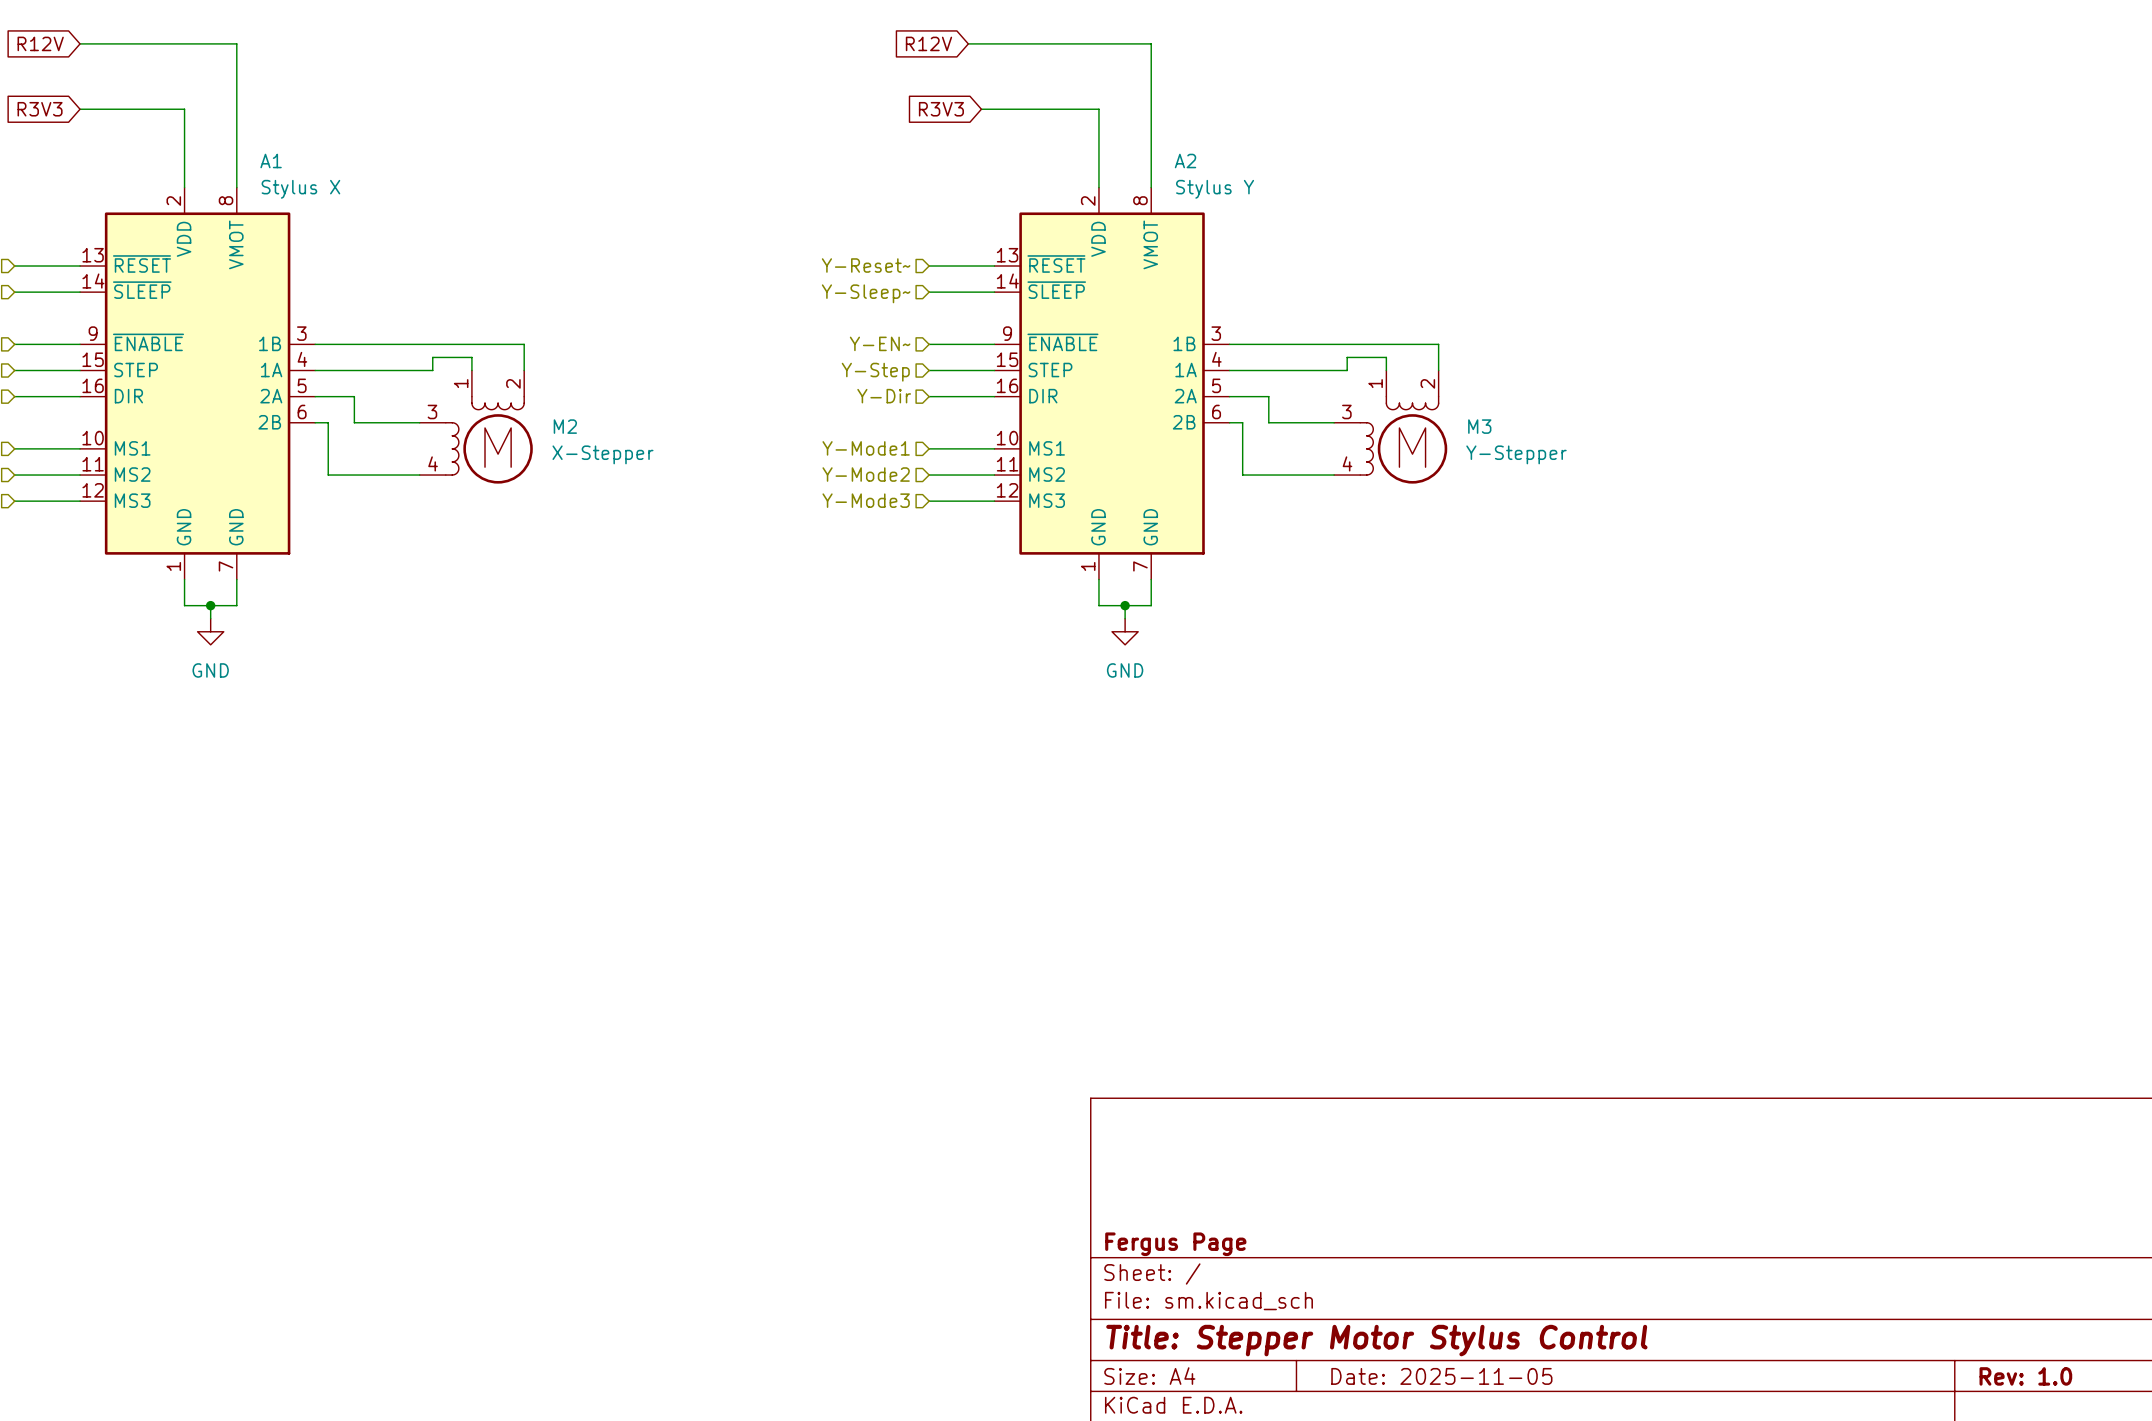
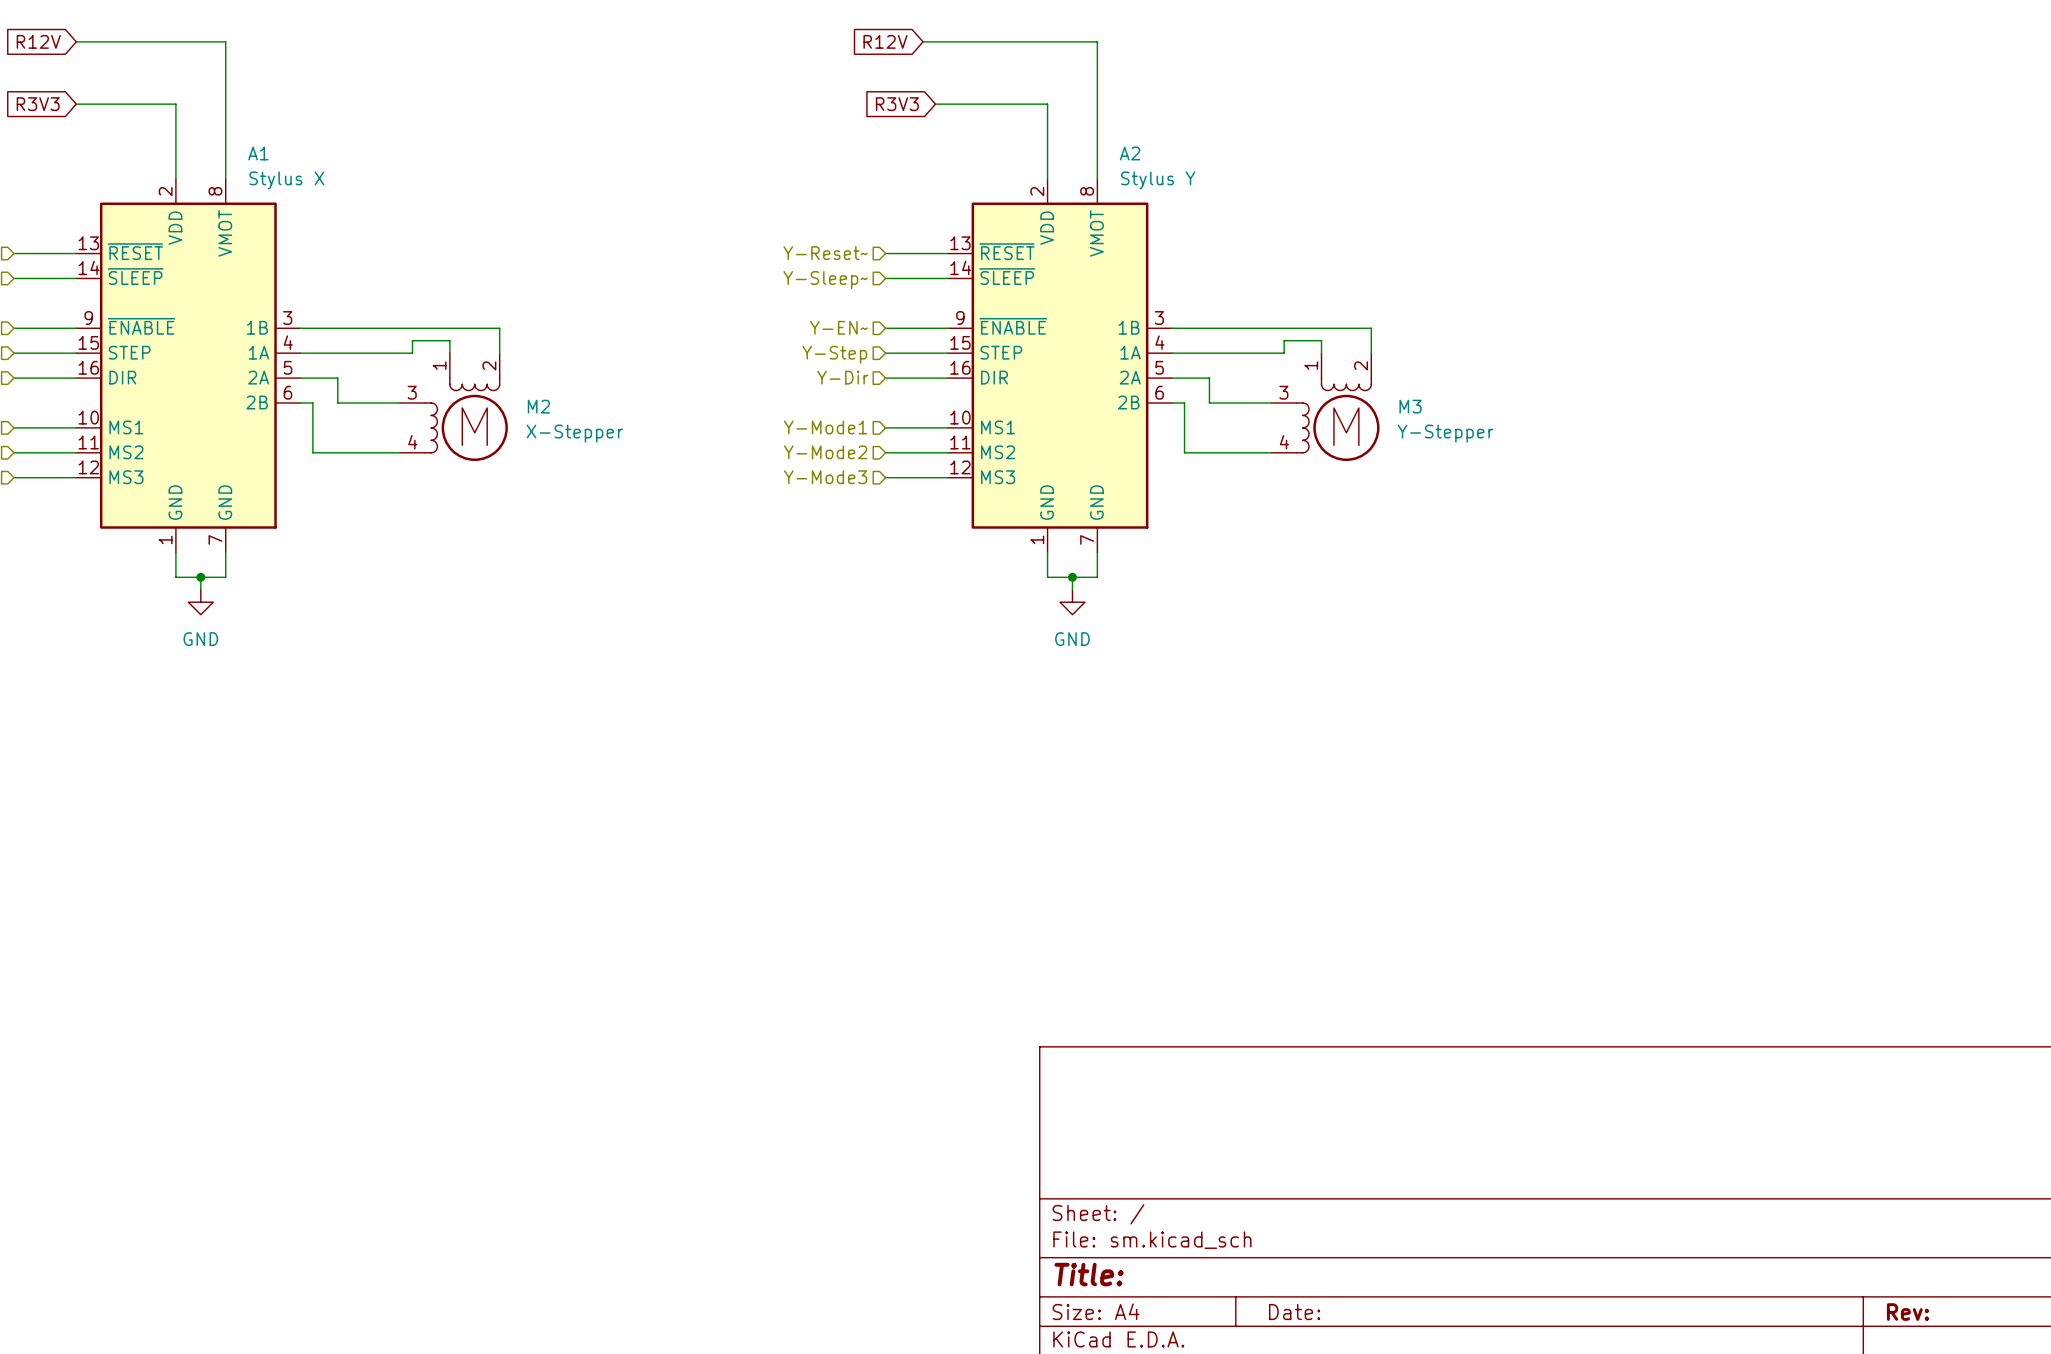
title block: Fergus Page (1175, 1244) -> none
title block: Title: Stepper Motor Stylus Control (1376, 1340) -> Title: (1089, 1274)
title block: Date: 2025-11-05 (1441, 1376) -> Date: (1294, 1312)
title block: Rev: 1.0 (2025, 1376) -> Rev: (1907, 1312)

